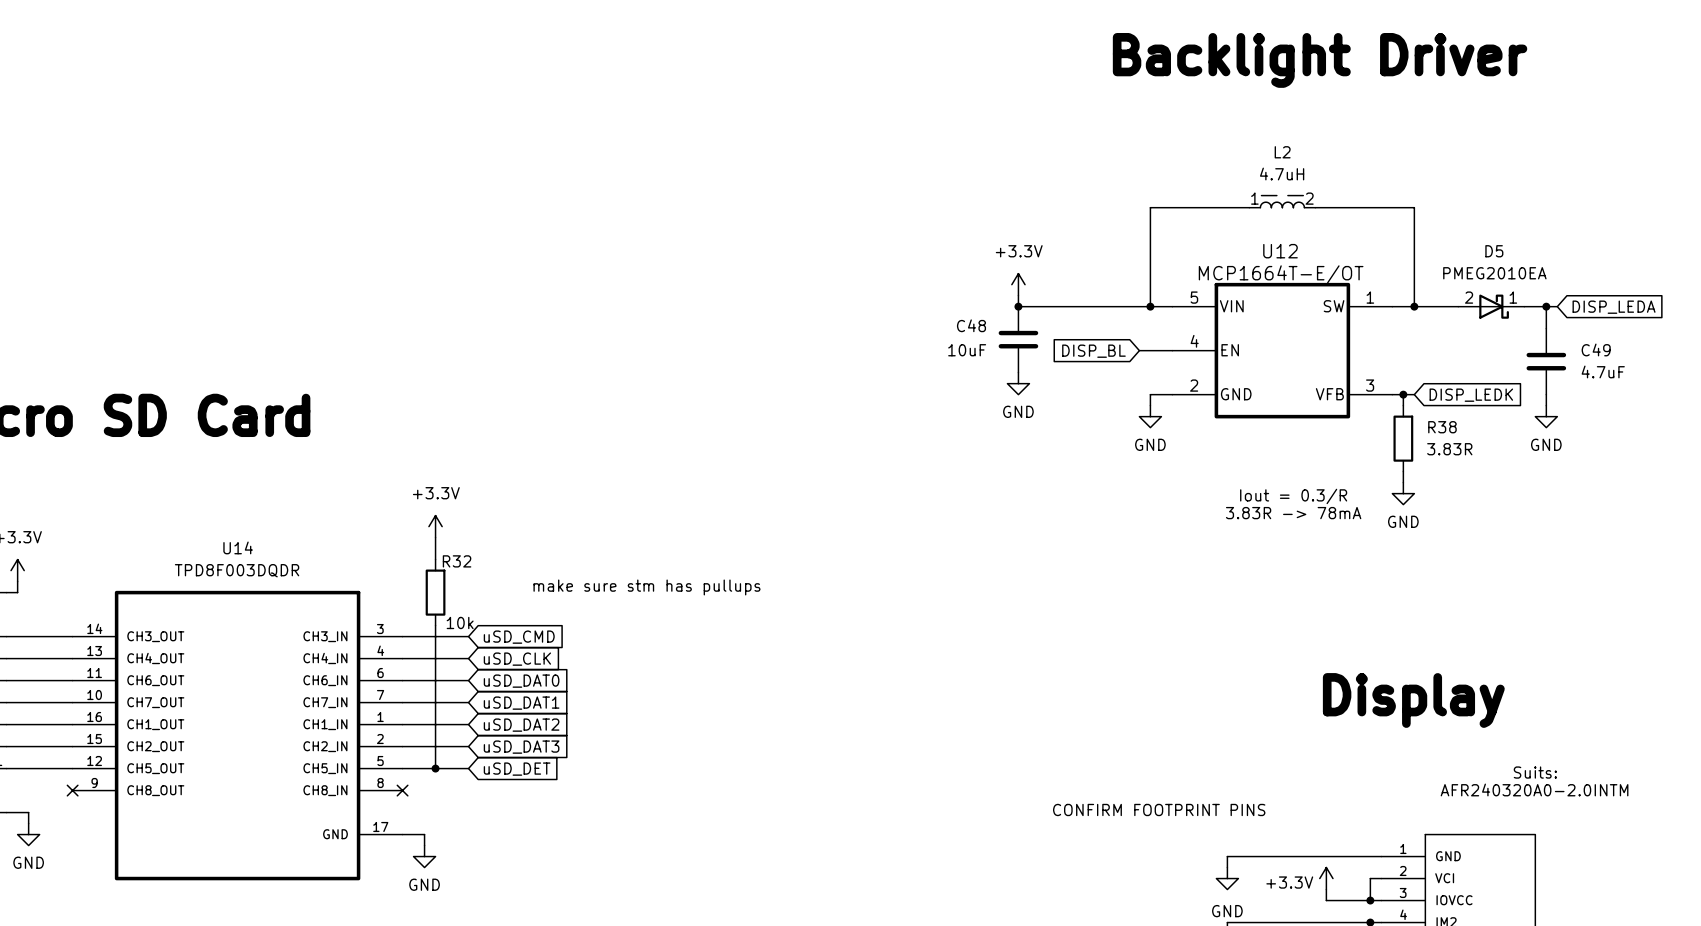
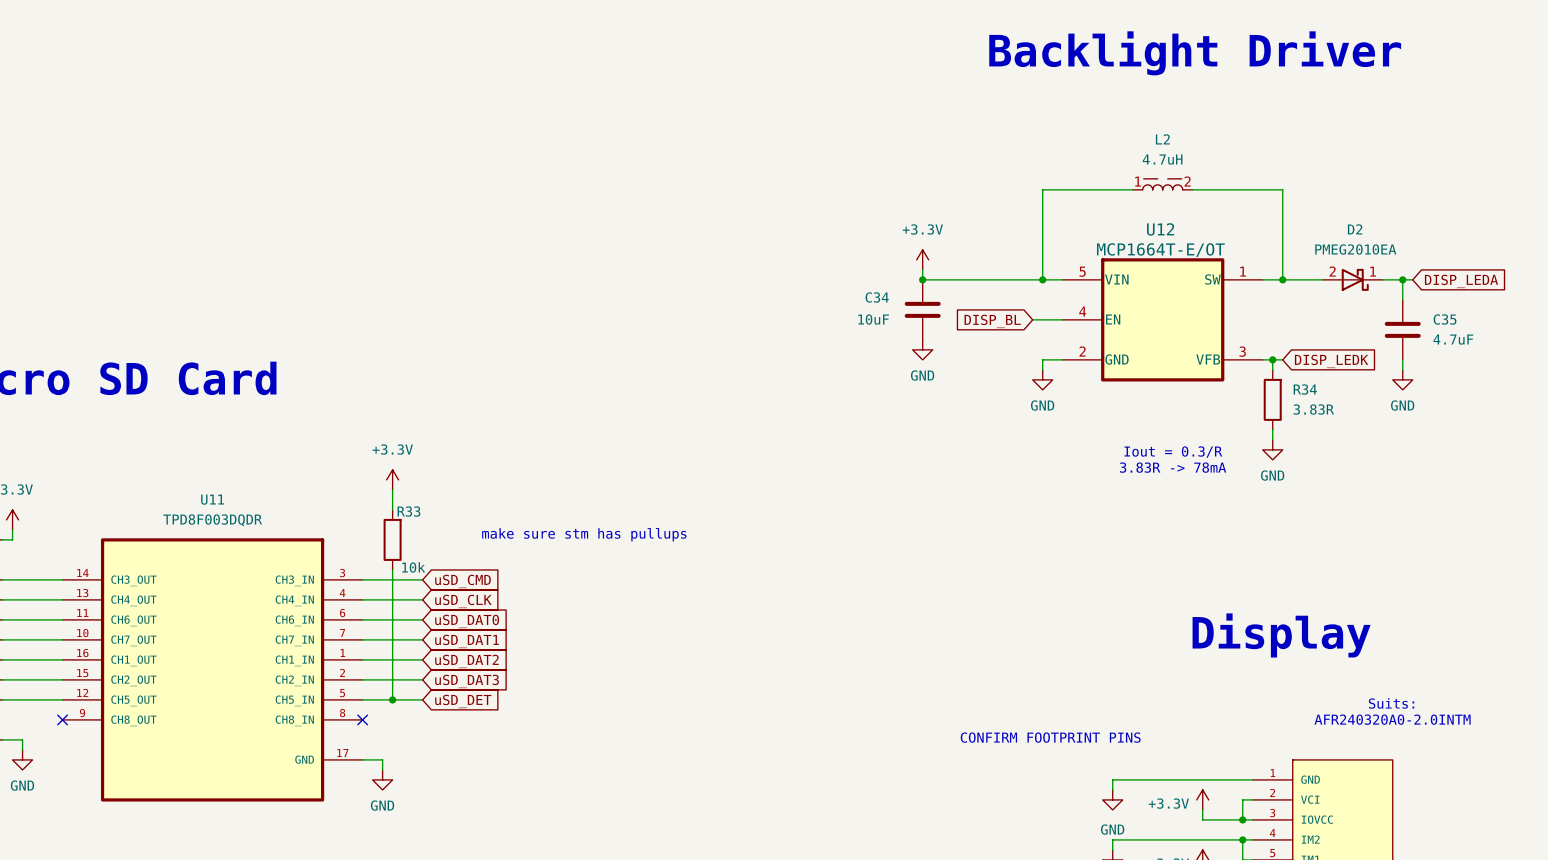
D5 name: D5 (1494, 251) -> D2 (1355, 229)
C48 name: C48 (971, 325) -> C34 (877, 297)
C49 name: C49 (1596, 349) -> C35 (1445, 319)
R38 name: R38 (1442, 427) -> R34 (1305, 389)
U14 name: U14 (238, 547) -> U11 (212, 499)
R32 name: R32 (457, 561) -> R33 (408, 511)

